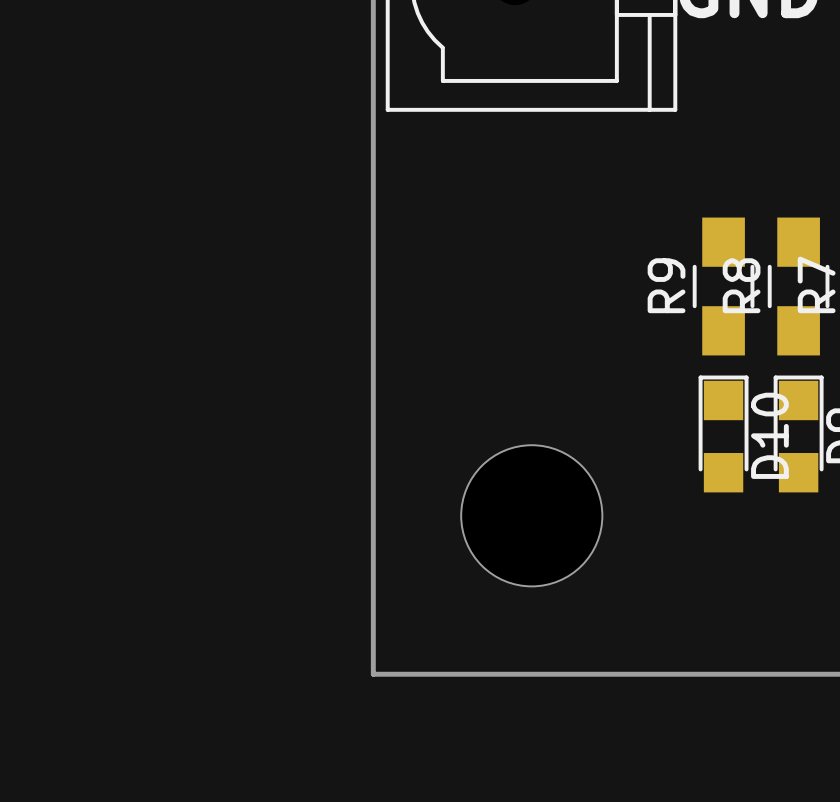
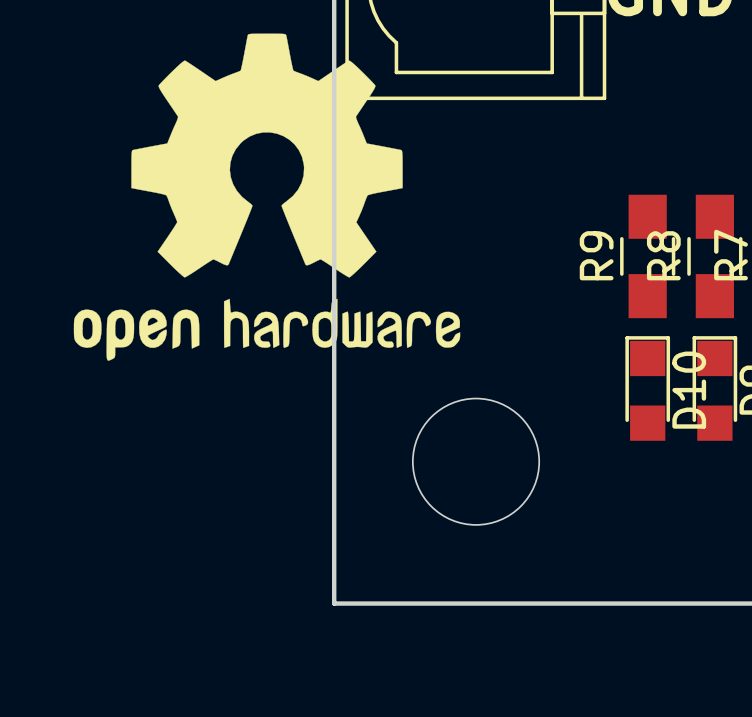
drawing: none -> [73, 33, 461, 361]

